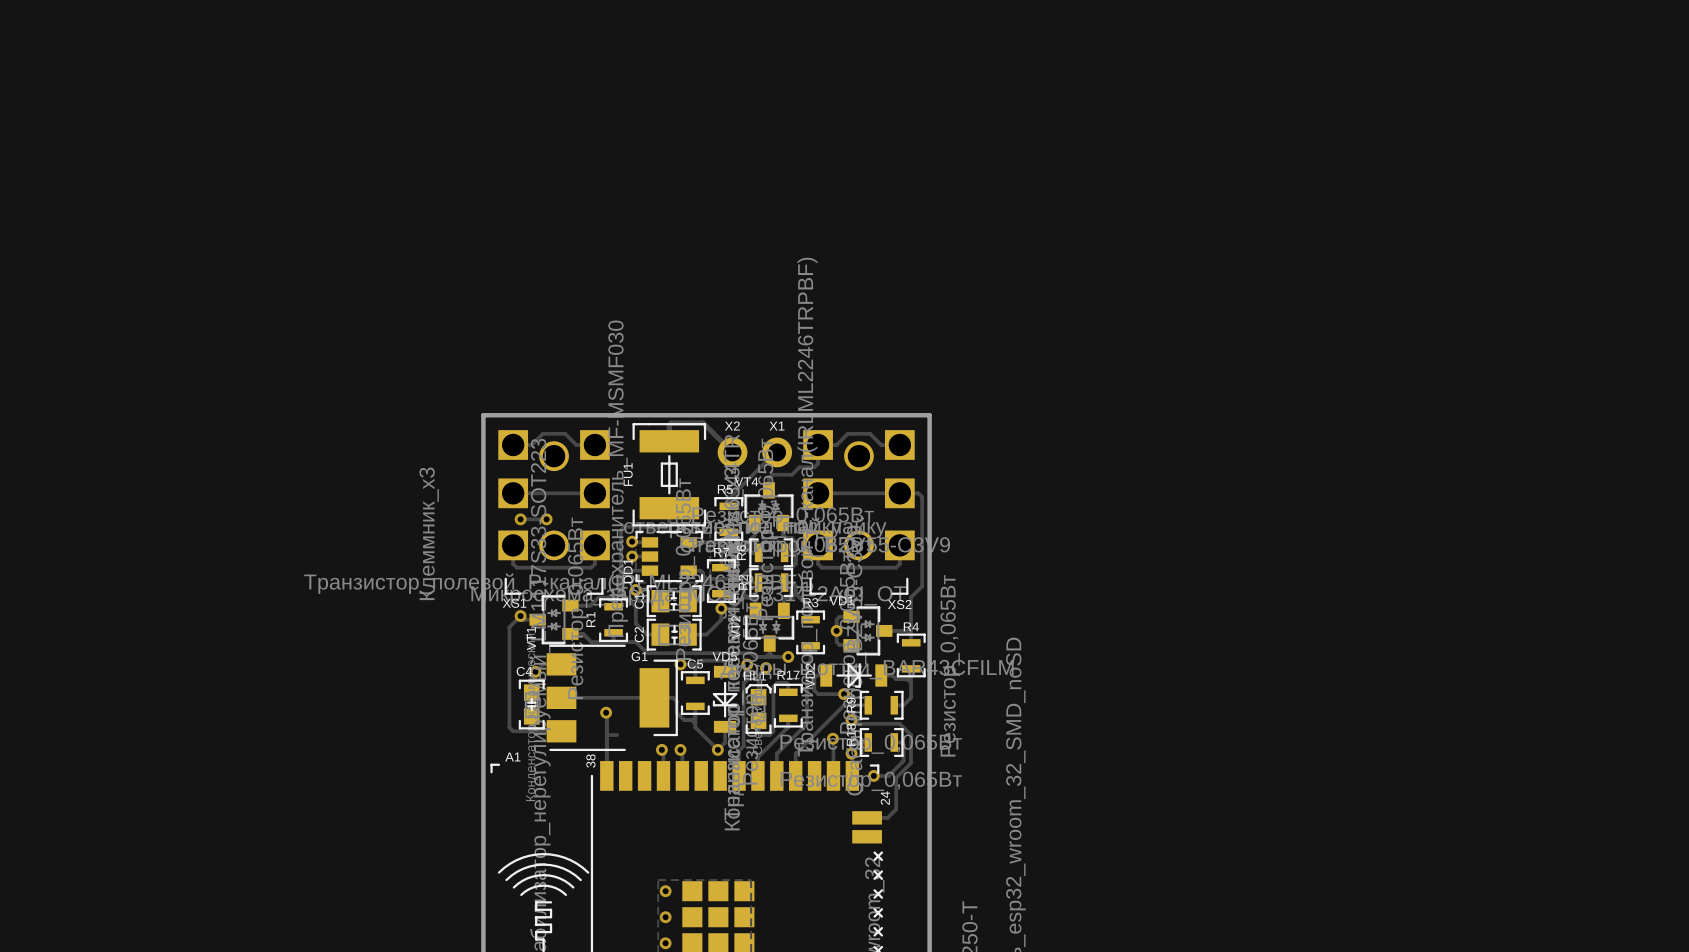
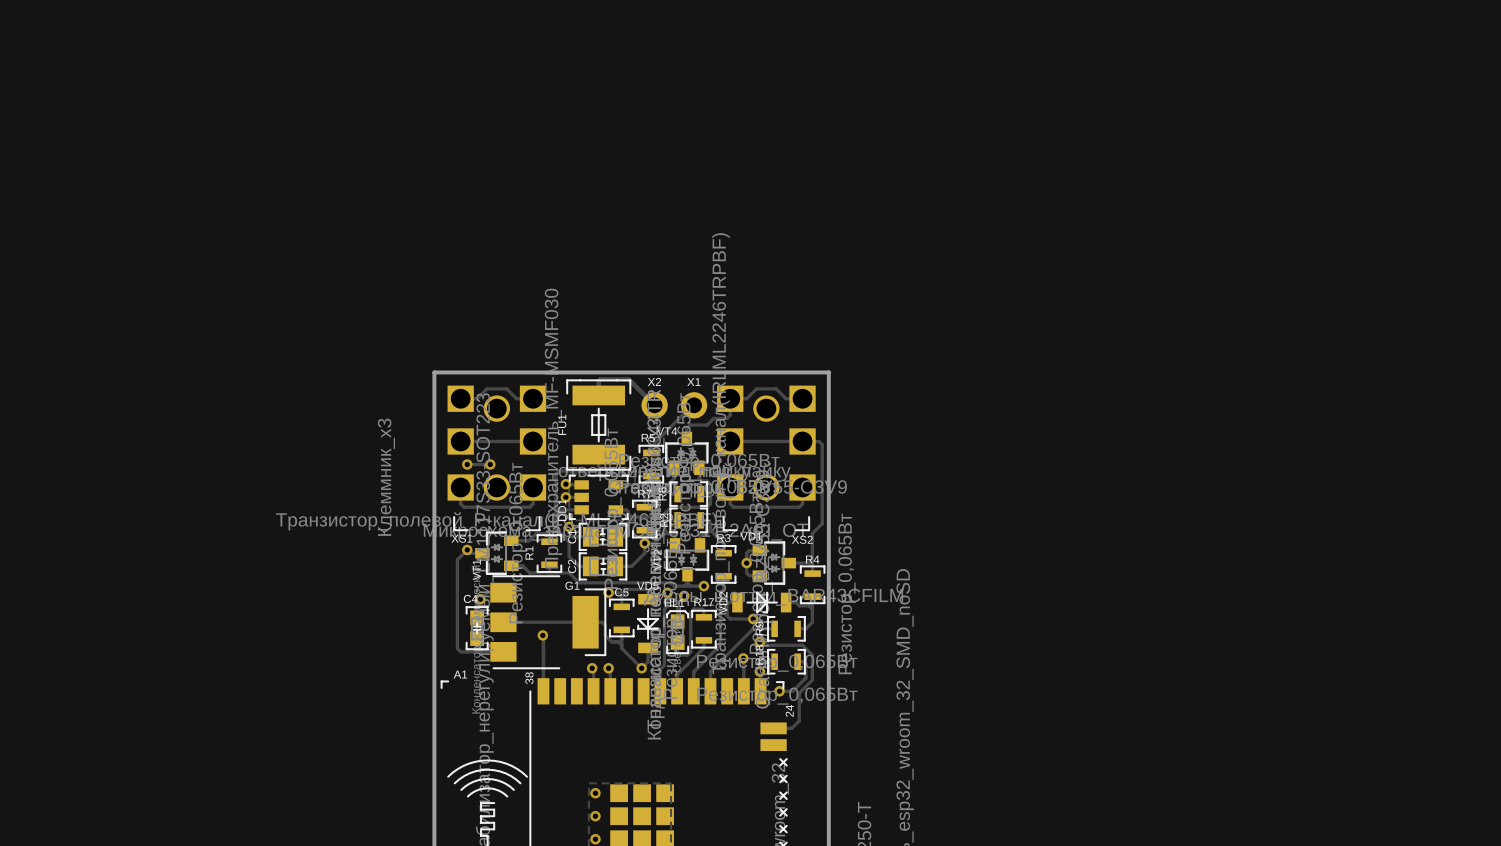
track: (617, 735) (606, 735) -> none

